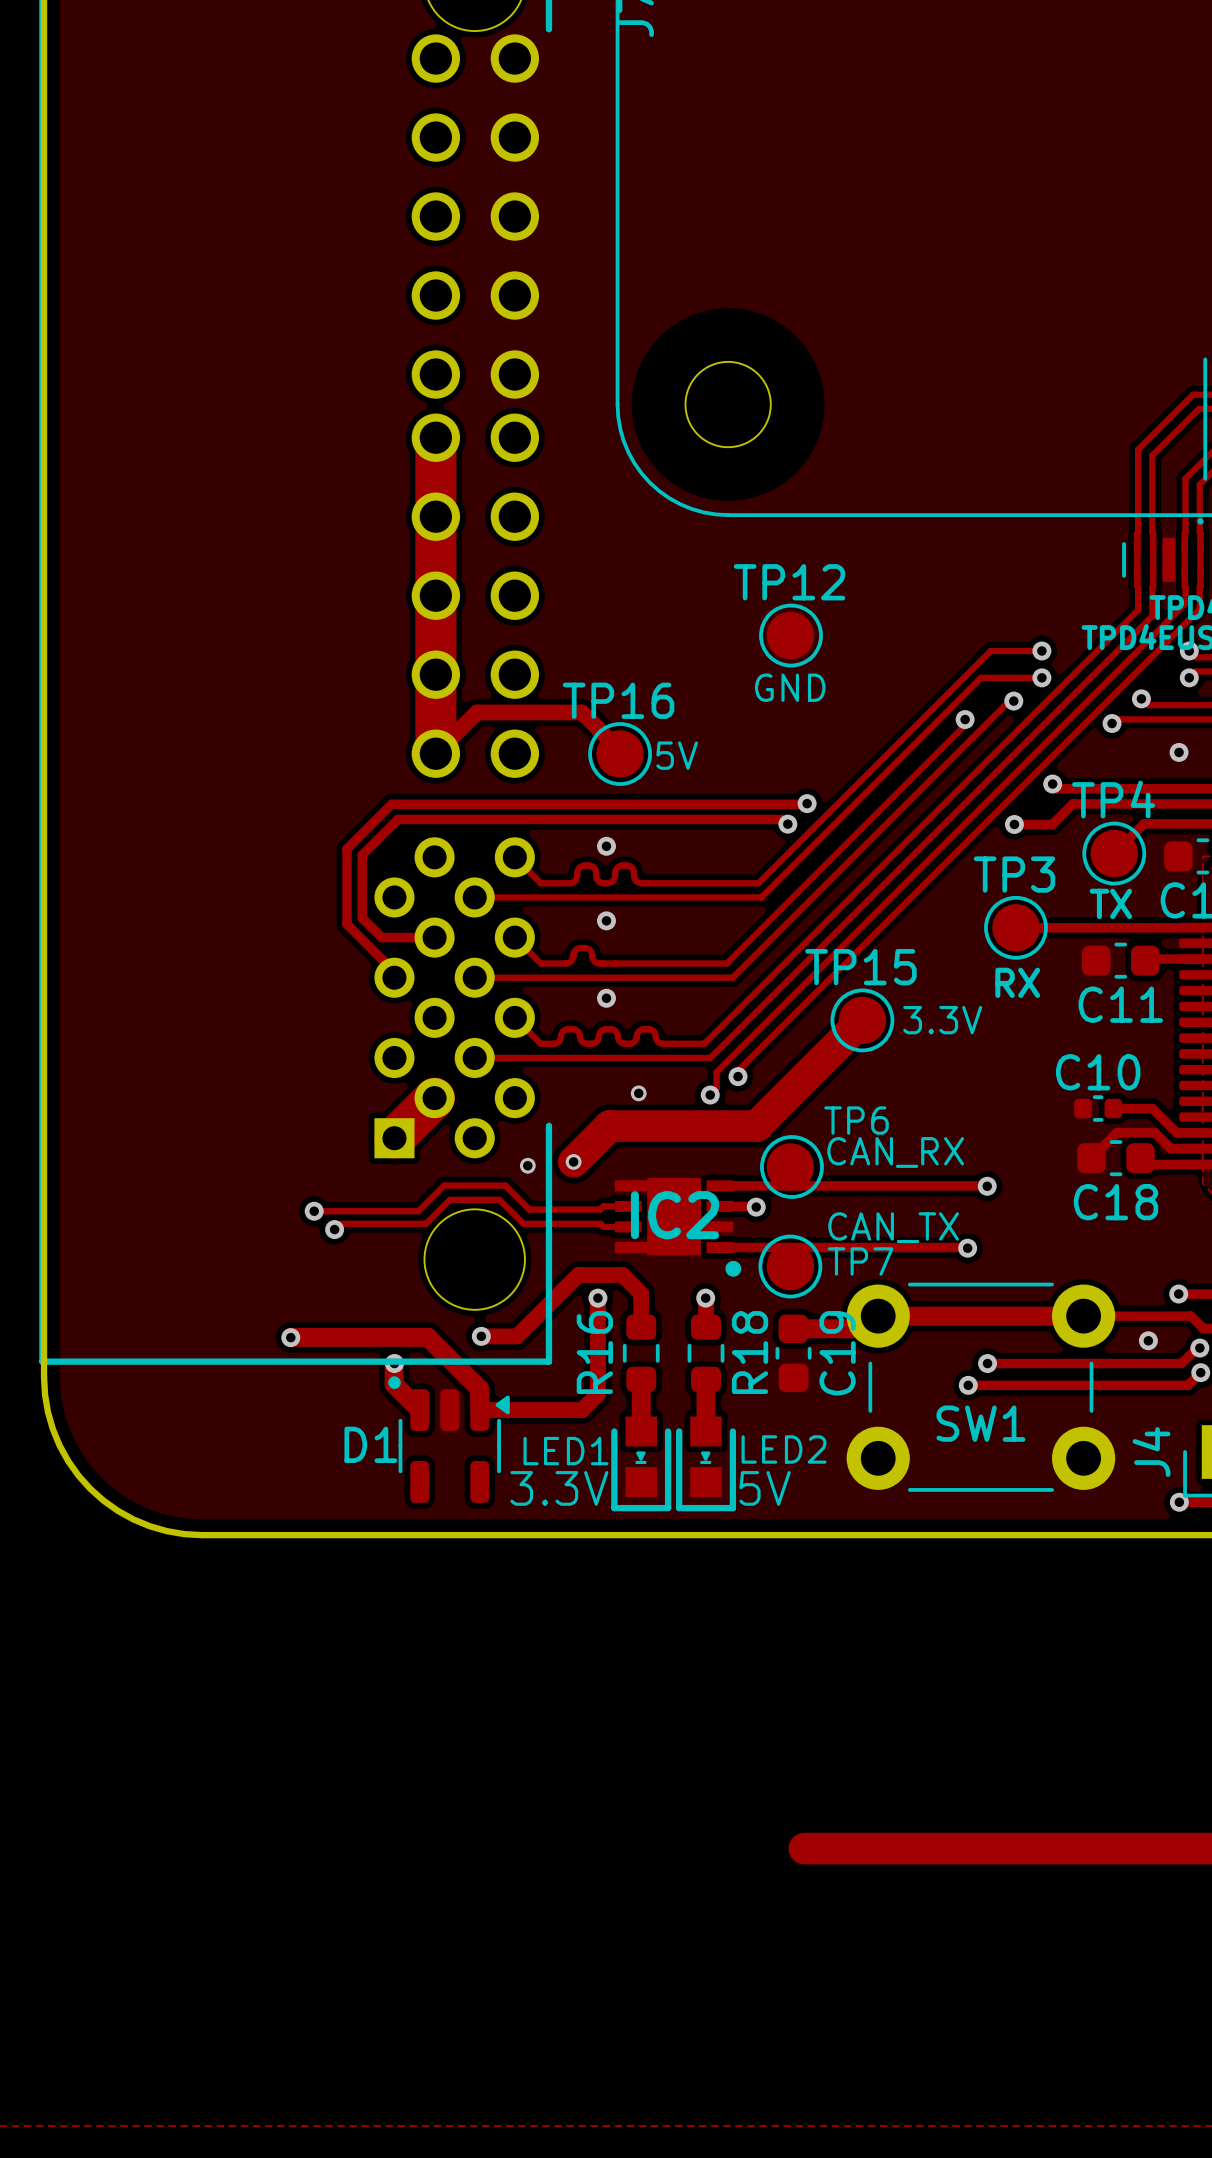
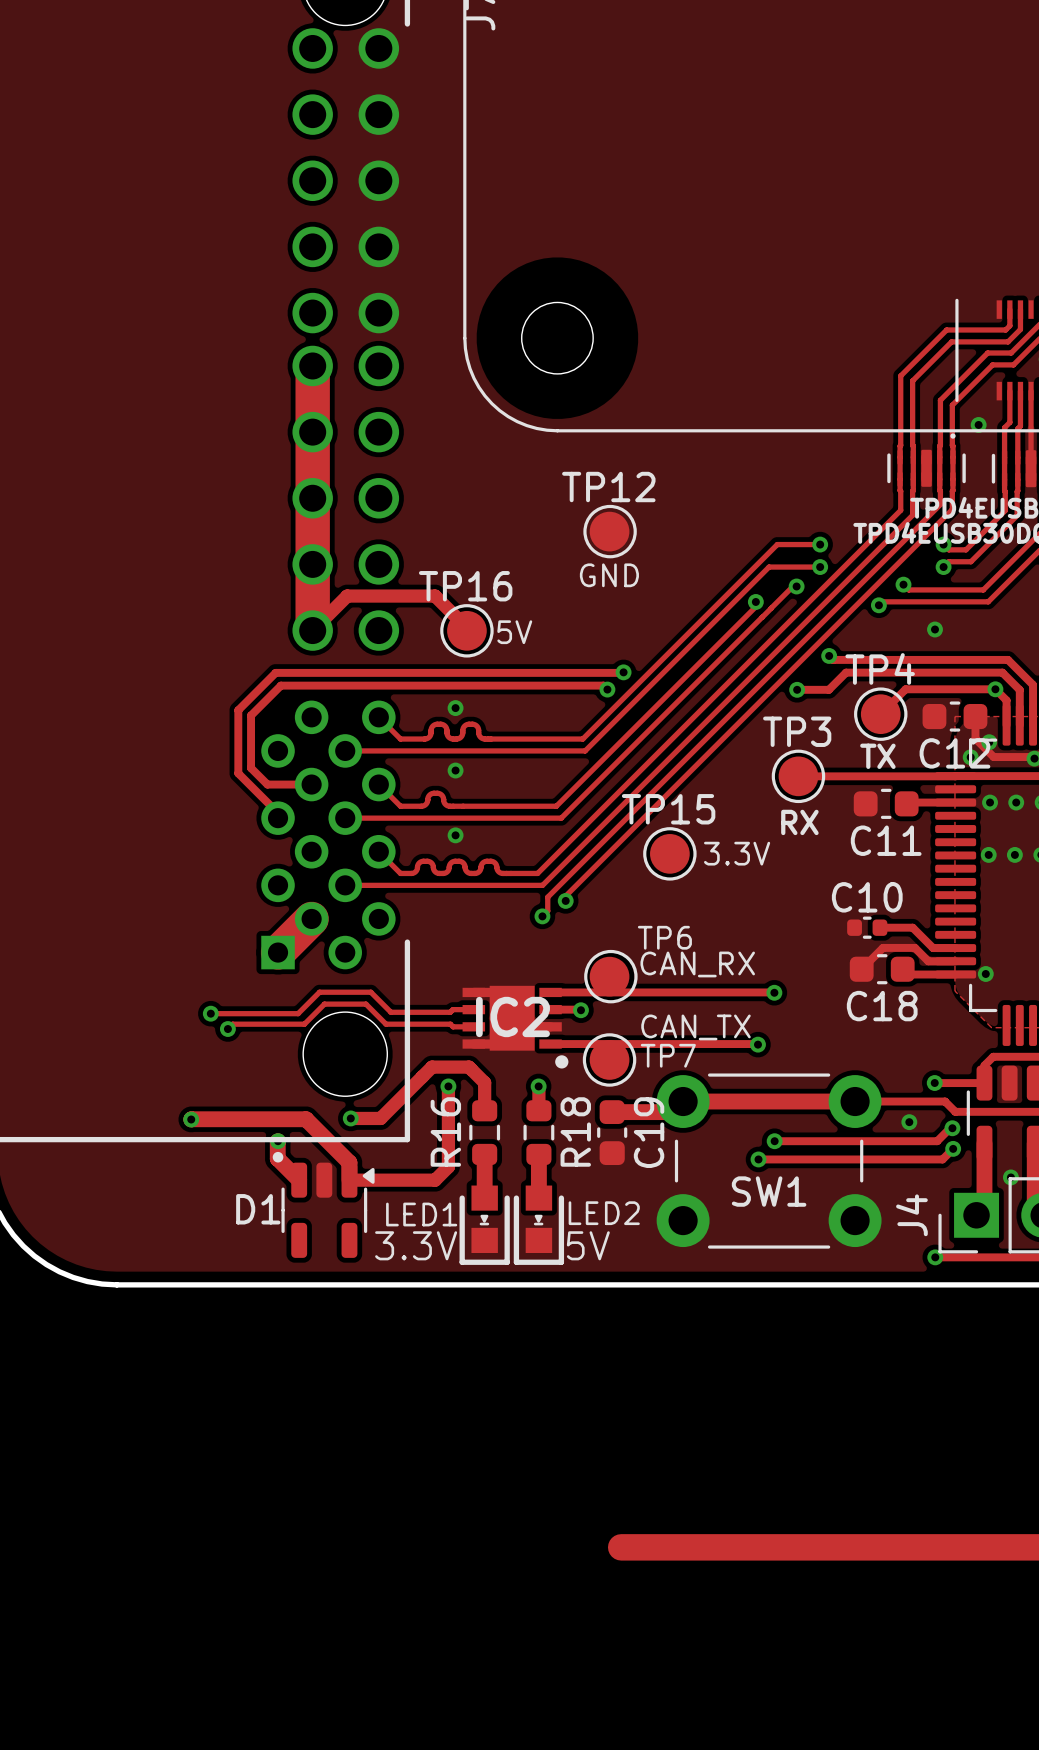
track: (862, 1020) (756, 1126) (609, 1126) (573, 1161) -> none
via: (638, 1093) -> none
via: (573, 1161) -> none
via: (527, 1165) -> none

